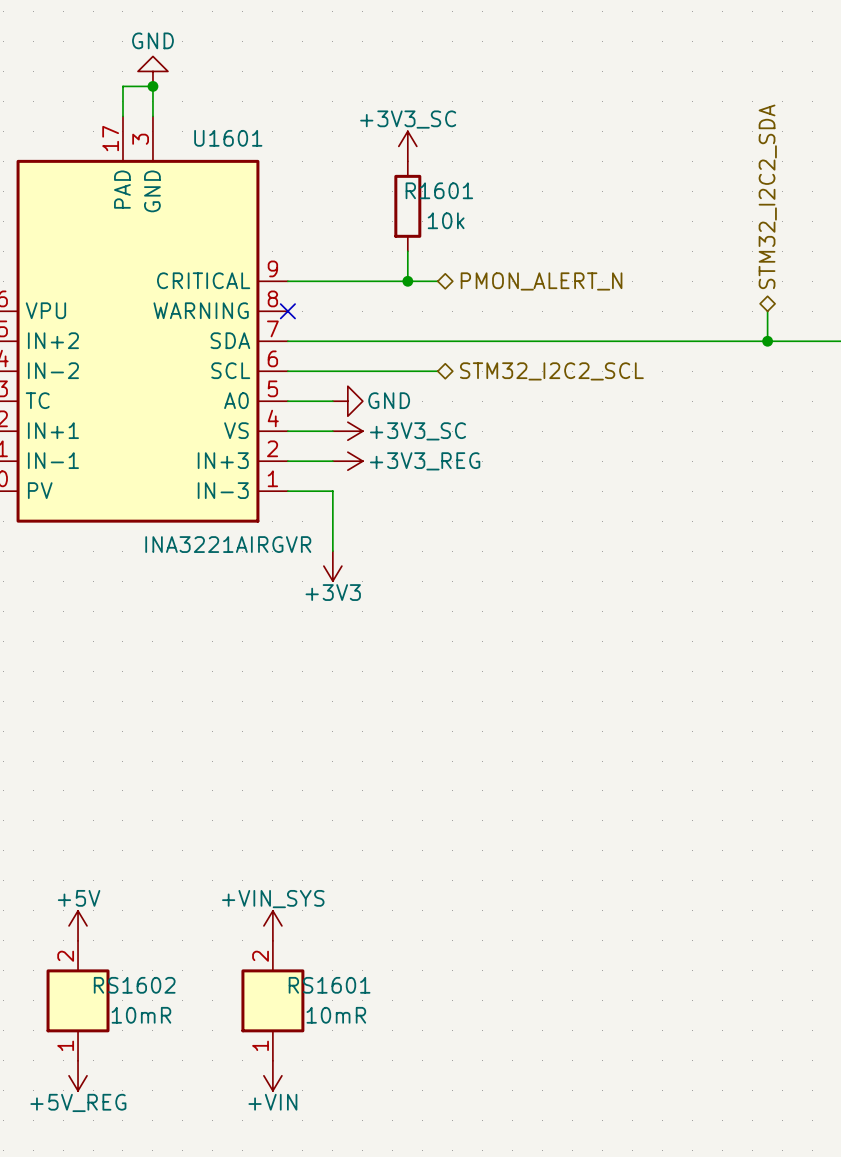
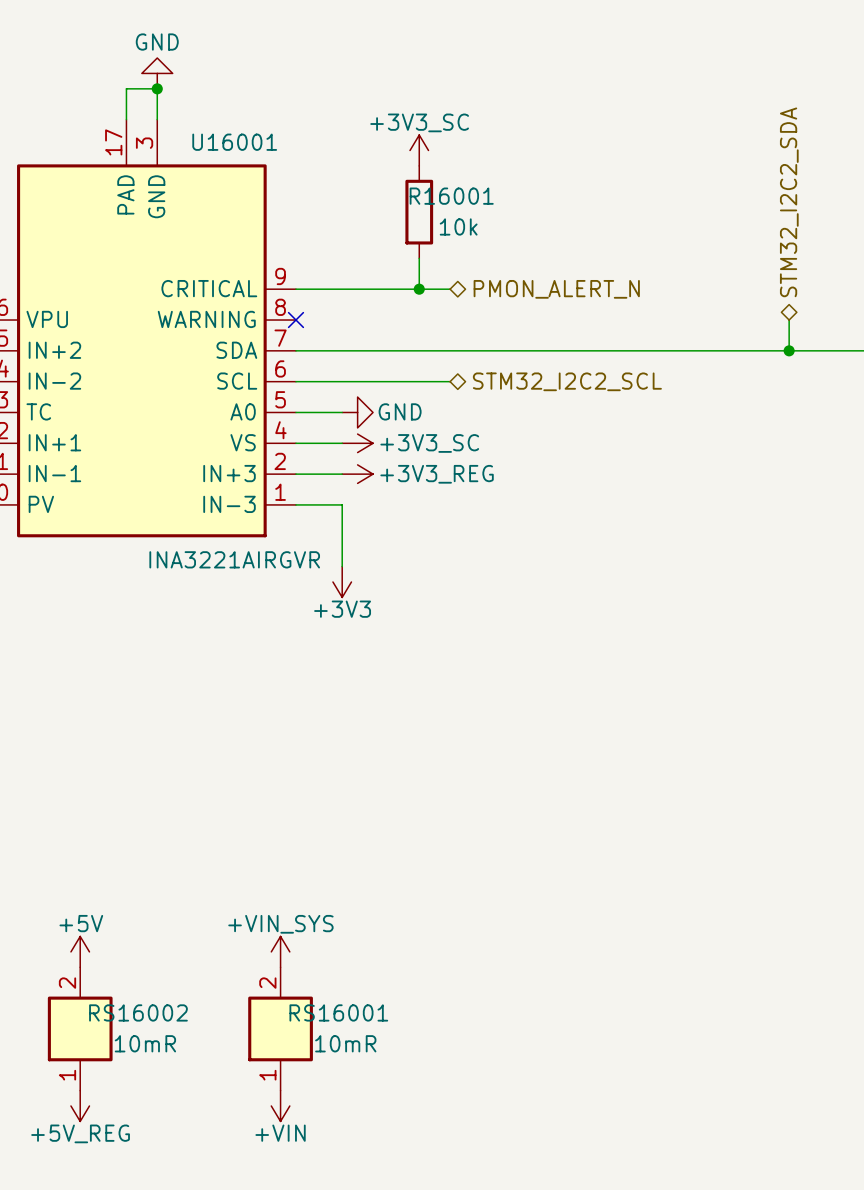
U1601 name: U1601 (228, 138) -> U16001 (234, 142)
R1601 name: R1601 (439, 190) -> R16001 (451, 196)
RS1602 name: RS1602 (134, 985) -> RS16002 (138, 1012)
RS1601 name: RS1601 (329, 985) -> RS16001 (338, 1012)

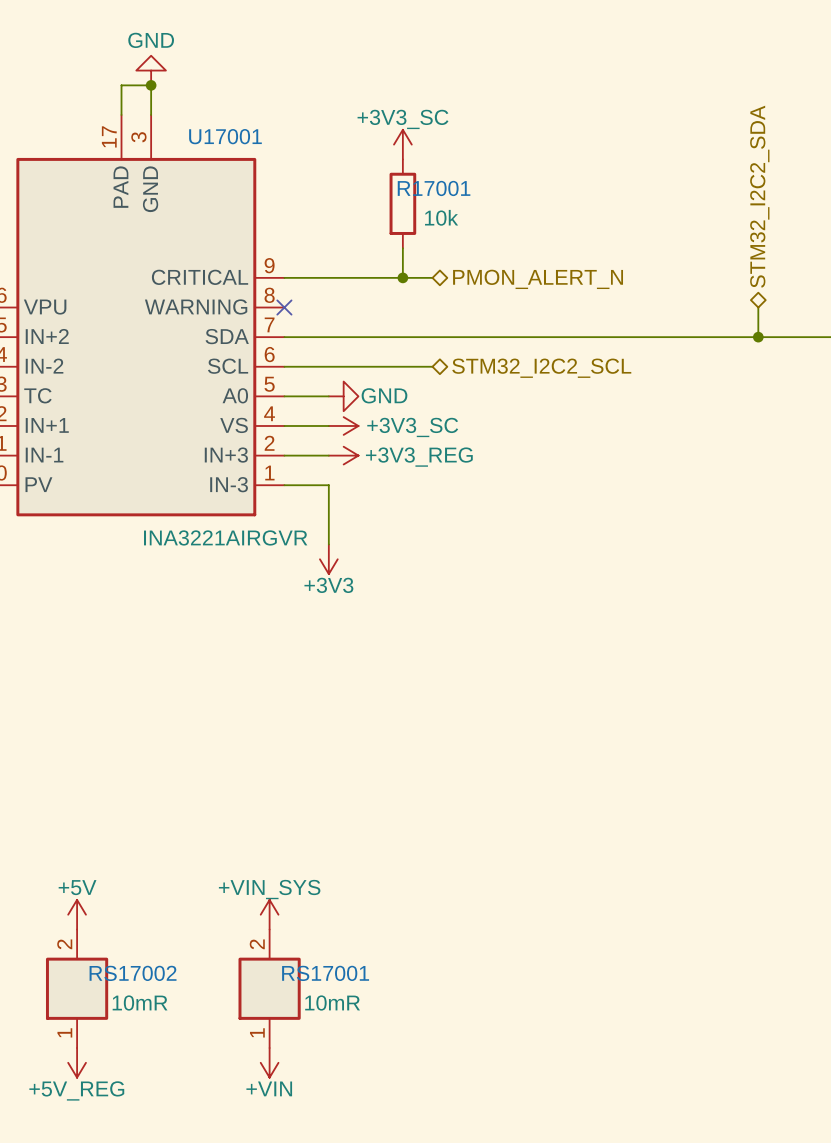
U16001 name: U16001 (234, 142) -> U17001 (225, 136)
R16001 name: R16001 (451, 196) -> R17001 (434, 188)
RS16002 name: RS16002 (138, 1012) -> RS17002 (133, 973)
RS16001 name: RS16001 (338, 1012) -> RS17001 (325, 973)

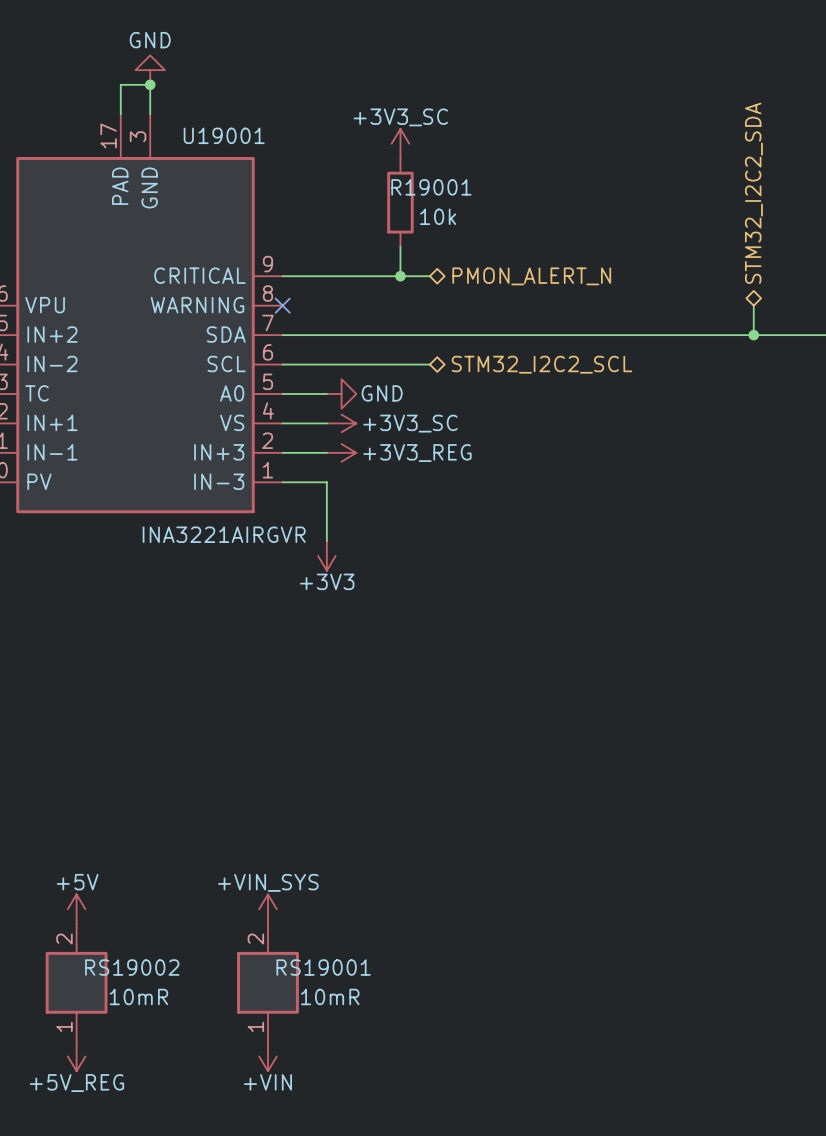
U17001 name: U17001 (225, 136) -> U19001 (224, 135)
R17001 name: R17001 (434, 188) -> R19001 (431, 187)
RS17002 name: RS17002 (133, 973) -> RS19002 (132, 967)
RS17001 name: RS17001 (325, 973) -> RS19001 (323, 967)

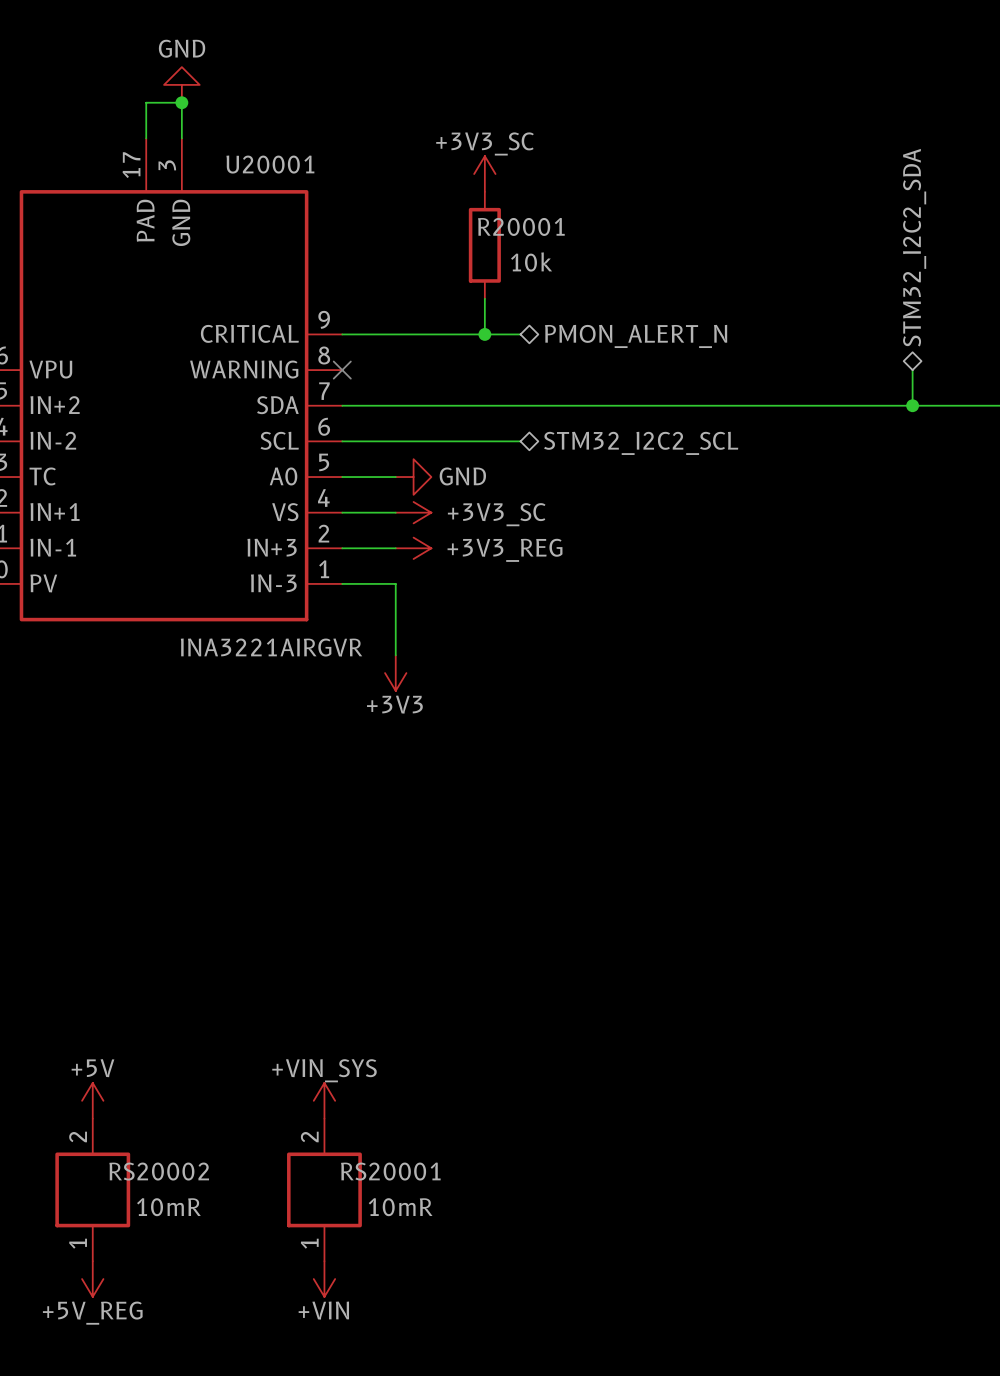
U19001 name: U19001 (224, 135) -> U20001 (270, 164)
R19001 name: R19001 (431, 187) -> R20001 (521, 226)
RS19002 name: RS19002 (132, 967) -> RS20002 (159, 1171)
RS19001 name: RS19001 (323, 967) -> RS20001 (390, 1171)

